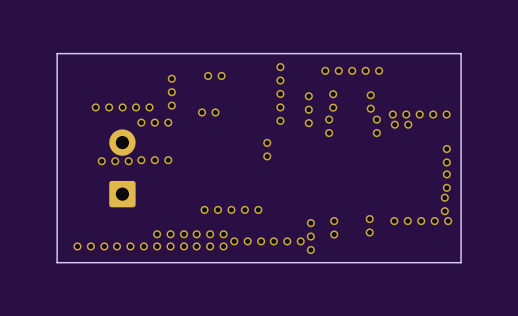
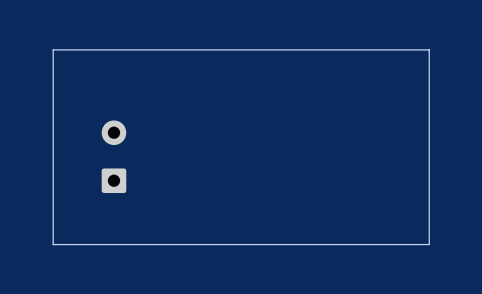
via: (280, 67) -> none
via: (325, 70) -> none
via: (338, 70) -> none
via: (352, 70) -> none
via: (365, 70) -> none
via: (379, 70) -> none
via: (208, 75) -> none
via: (221, 75) -> none
via: (171, 78) -> none
via: (280, 80) -> none
via: (171, 92) -> none
via: (280, 93) -> none
via: (333, 94) -> none
via: (370, 95) -> none
via: (308, 96) -> none
via: (171, 105) -> none
via: (95, 107) -> none
via: (109, 107) -> none
via: (122, 107) -> none
via: (136, 107) -> none
via: (149, 107) -> none
via: (280, 107) -> none
via: (333, 107) -> none
via: (370, 108) -> none
via: (308, 109) -> none
via: (202, 112) -> none
via: (215, 112) -> none
via: (392, 114) -> none
via: (406, 114) -> none
via: (419, 114) -> none
via: (433, 114) -> none
via: (446, 114) -> none
via: (329, 119) -> none
via: (376, 119) -> none
via: (280, 120) -> none
via: (141, 122) -> none
via: (154, 122) -> none
via: (168, 122) -> none
via: (308, 123) -> none
via: (394, 124) -> none
via: (408, 124) -> none
via: (329, 133) -> none
via: (376, 133) -> none
via: (267, 142) -> none
via: (446, 149) -> none
via: (267, 156) -> none
via: (141, 160) -> none
via: (154, 160) -> none
via: (168, 160) -> none
via: (101, 161) -> none
via: (115, 161) -> none
via: (128, 161) -> none
via: (446, 162) -> none
via: (446, 174) -> none
via: (446, 187) -> none
via: (444, 197) -> none
via: (204, 209) -> none
via: (218, 209) -> none
via: (231, 209) -> none
via: (244, 209) -> none
via: (258, 209) -> none
via: (444, 211) -> none
via: (369, 219) -> none
via: (334, 221) -> none
via: (394, 221) -> none
via: (407, 221) -> none
via: (421, 221) -> none
via: (434, 221) -> none
via: (448, 221) -> none
via: (310, 223) -> none
via: (369, 232) -> none
via: (157, 234) -> none
via: (170, 234) -> none
via: (184, 234) -> none
via: (196, 234) -> none
via: (210, 234) -> none
via: (223, 234) -> none
via: (334, 234) -> none
via: (310, 236) -> none
via: (234, 241) -> none
via: (247, 241) -> none
via: (261, 241) -> none
via: (273, 241) -> none
via: (287, 241) -> none
via: (300, 241) -> none
via: (77, 246) -> none
via: (90, 246) -> none
via: (104, 246) -> none
via: (117, 246) -> none
via: (130, 246) -> none
via: (143, 246) -> none
via: (157, 246) -> none
via: (170, 246) -> none
via: (184, 246) -> none
via: (196, 246) -> none
via: (210, 246) -> none
via: (223, 246) -> none
via: (310, 250) -> none

